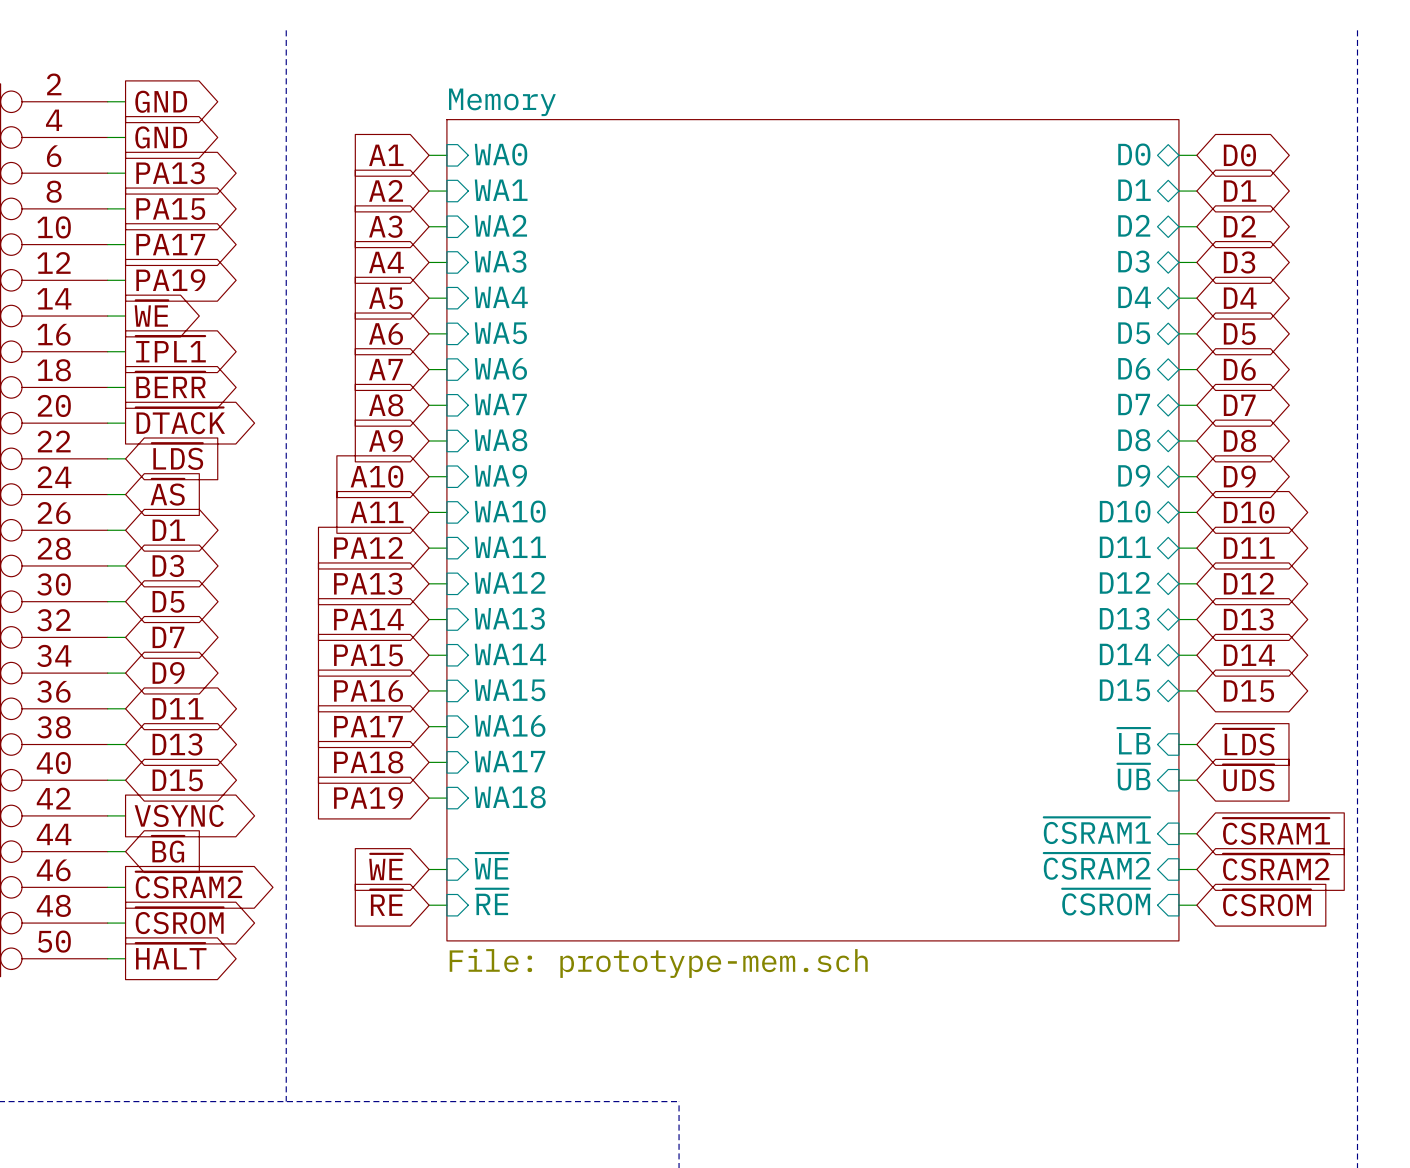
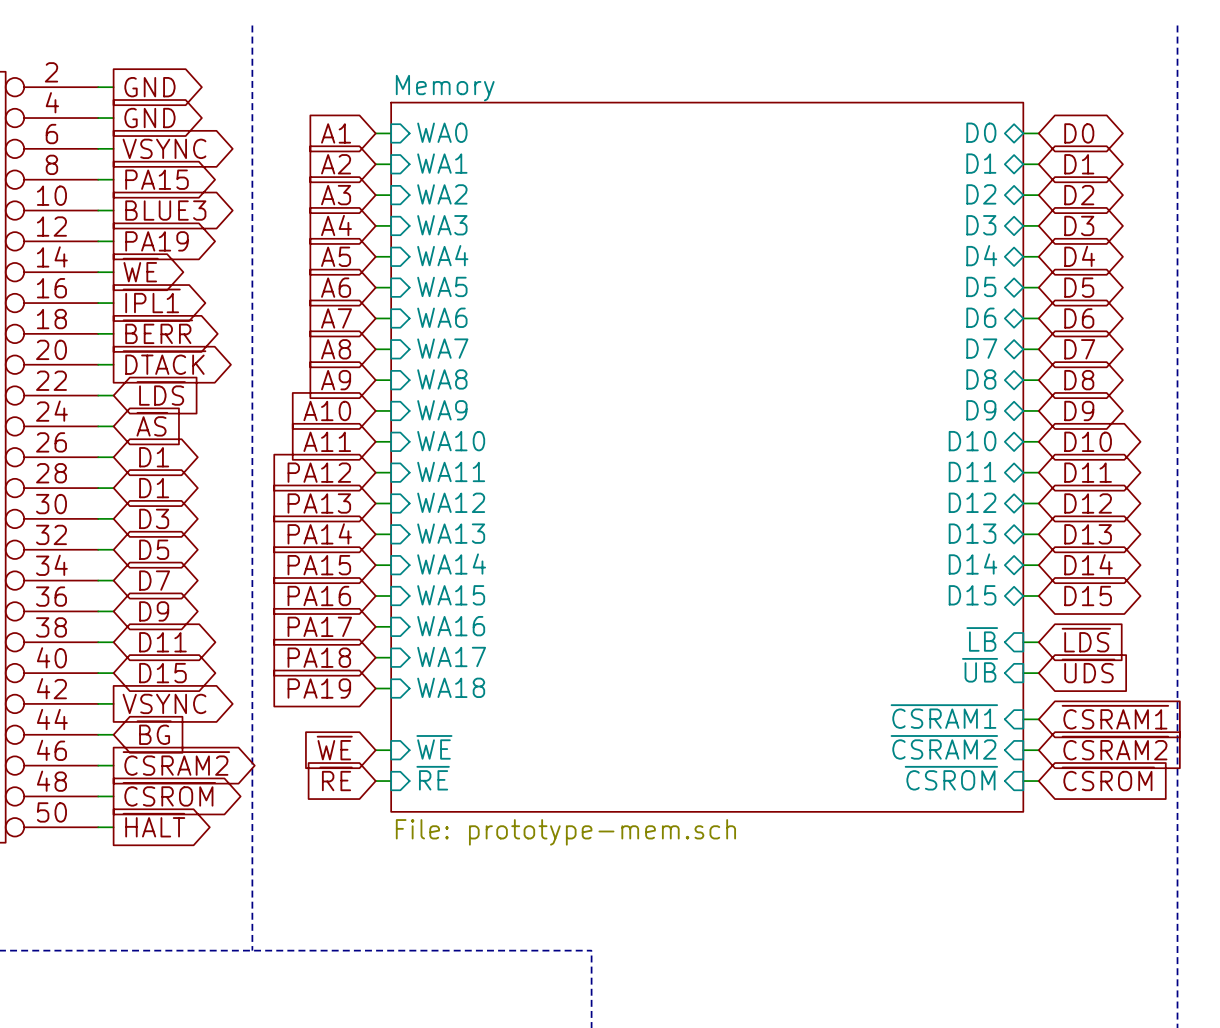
global label: PA13 (170, 173) -> VSYNC (164, 148)
global label: PA17 (170, 244) -> BLUE3 (165, 210)
global label: D3 (168, 565) -> D1 (154, 488)
global label: D5 (168, 601) -> D3 (154, 518)
global label: D7 (168, 637) -> D5 (154, 549)
global label: D9 (168, 672) -> D7 (154, 580)
global label: D11 (178, 708) -> D9 (154, 611)
global label: D13 (177, 744) -> D11 (162, 642)

